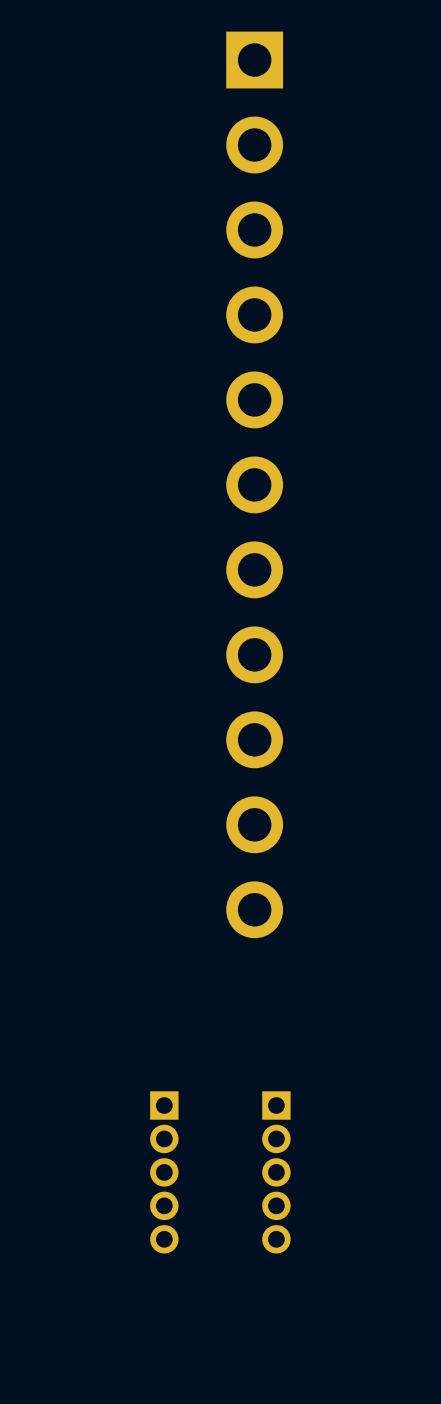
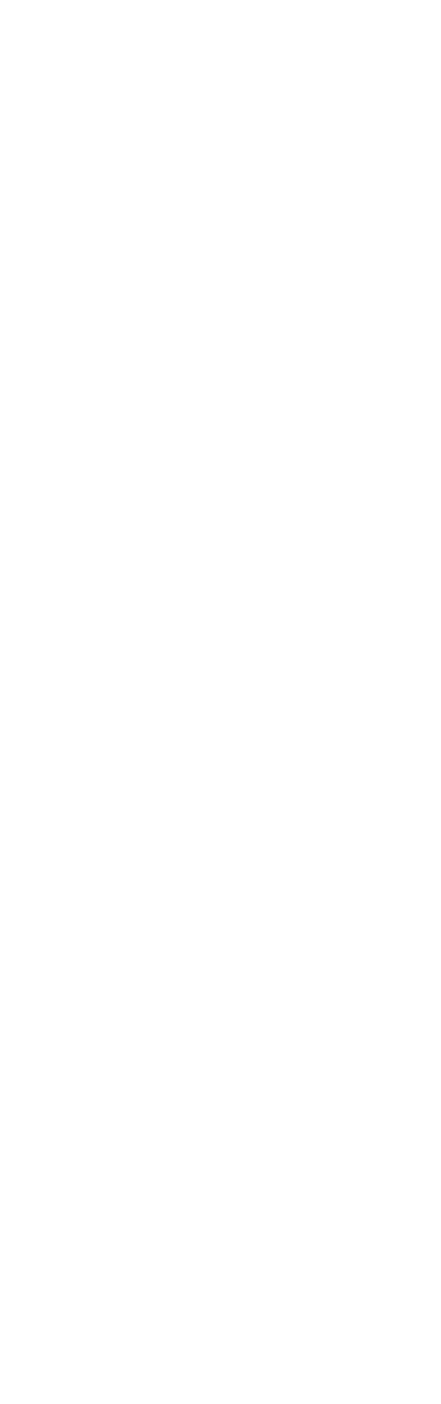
part: (254, 484) -> none
part: (164, 1172) -> none
part: (276, 1172) -> none

